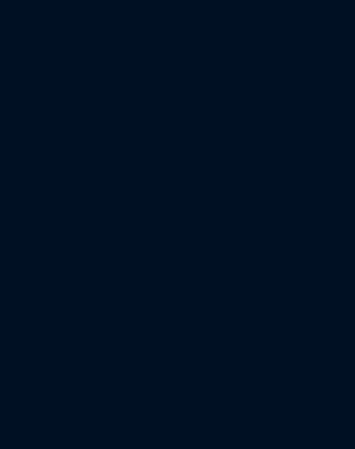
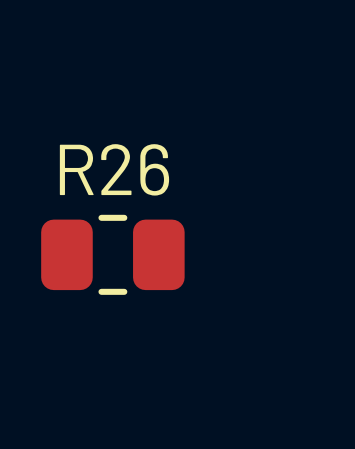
R26: none -> (112, 254)

